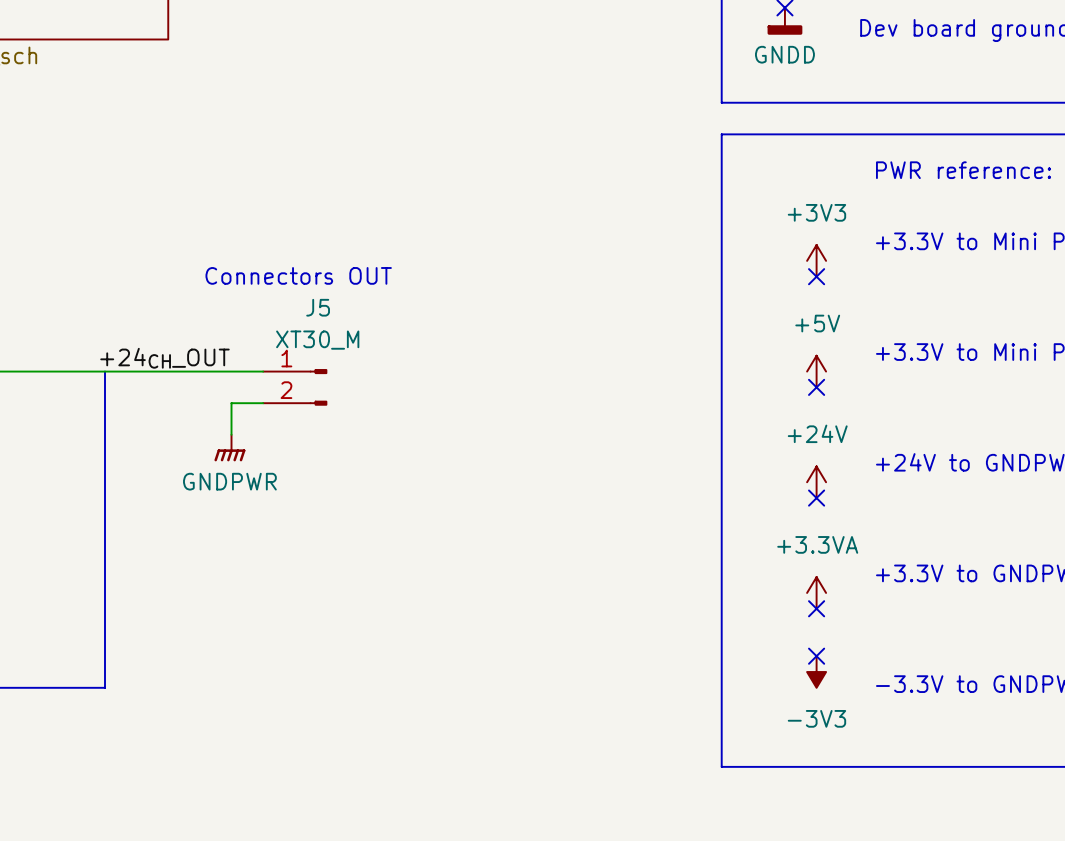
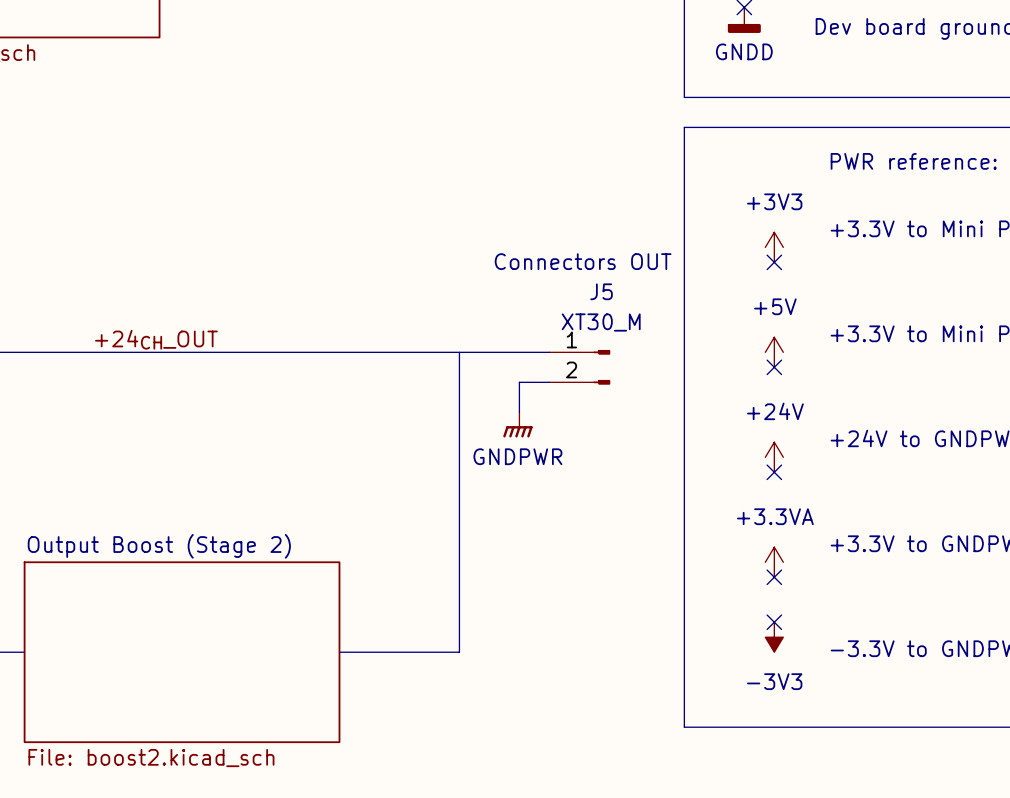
text: Connectors OUT (298, 275) -> none
text: none -> Connectors OUT (583, 261)
line: (105, 371) (105, 687) (25, 687) -> none
wire: none -> (249, 352) (549, 352)
line: none -> (459, 352) (459, 652) (339, 652)
J5 position: (295, 387) -> (579, 367)
wire: (263, 403) (231, 403) (231, 434) -> none
wire: none -> (549, 382) (519, 382) (519, 412)
power symbol: GNDPWR (229, 448) -> none
power symbol: none -> GNDPWR (517, 424)
sheet Output Boost (Stage 2): none -> File: boost2.kicad_sch (182, 652)

